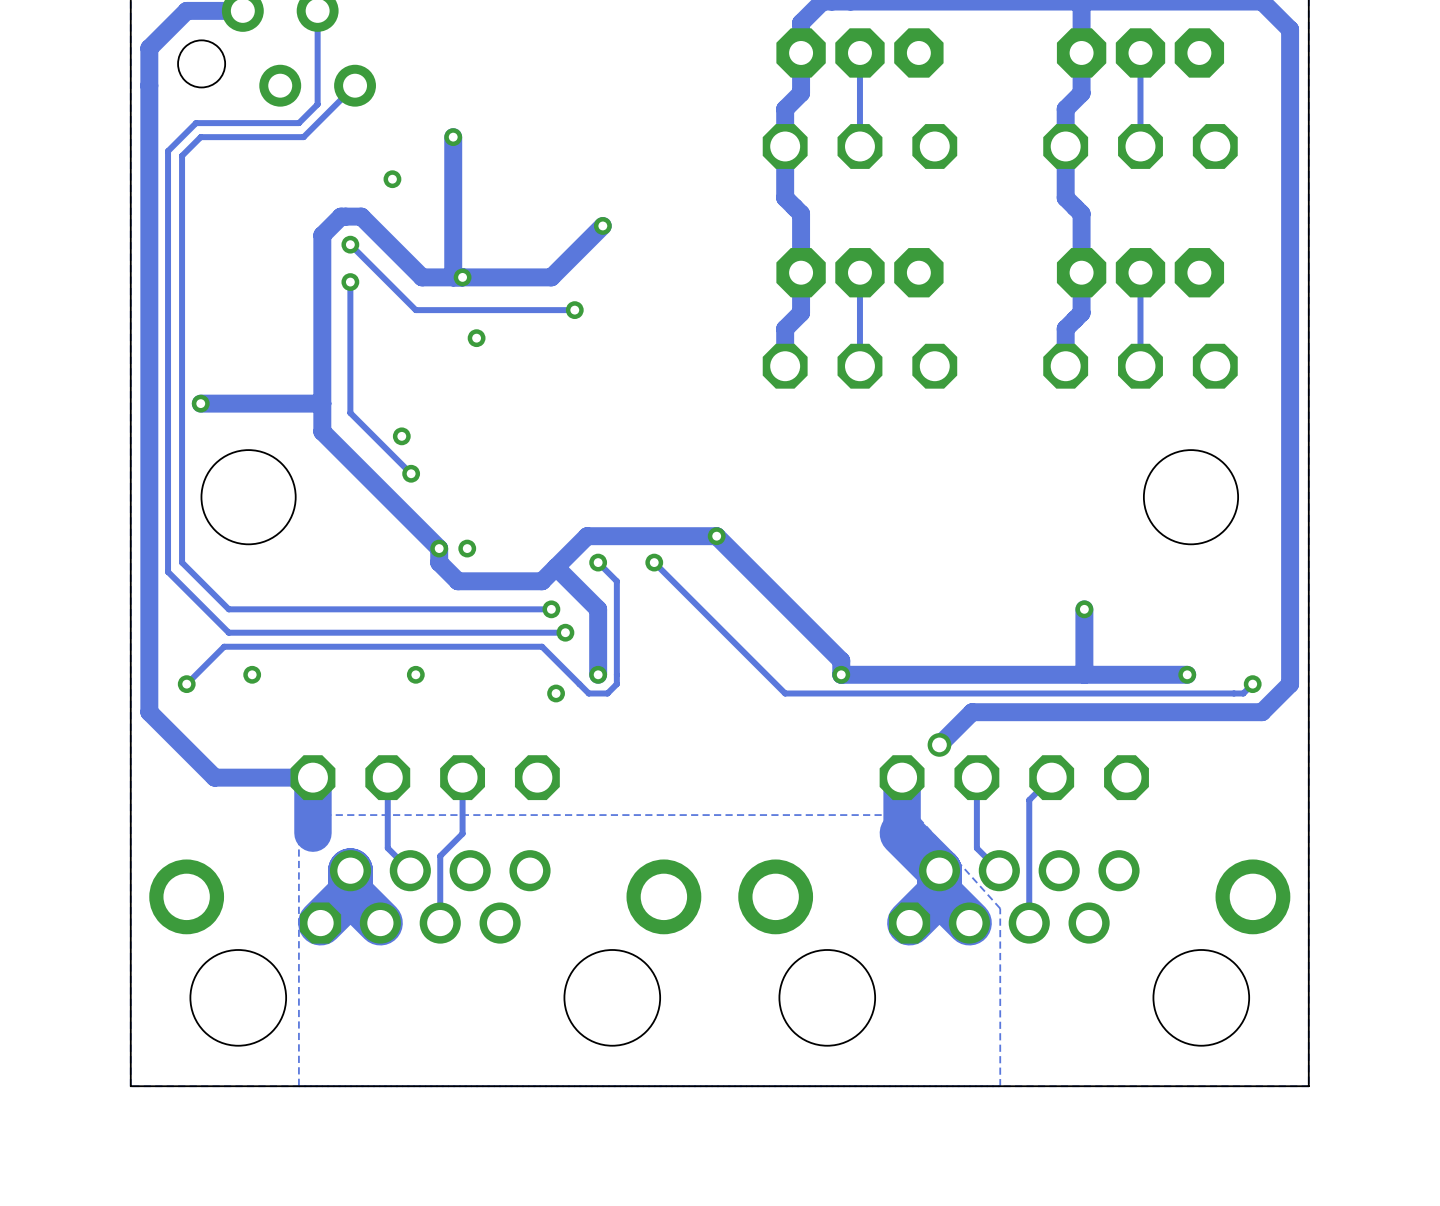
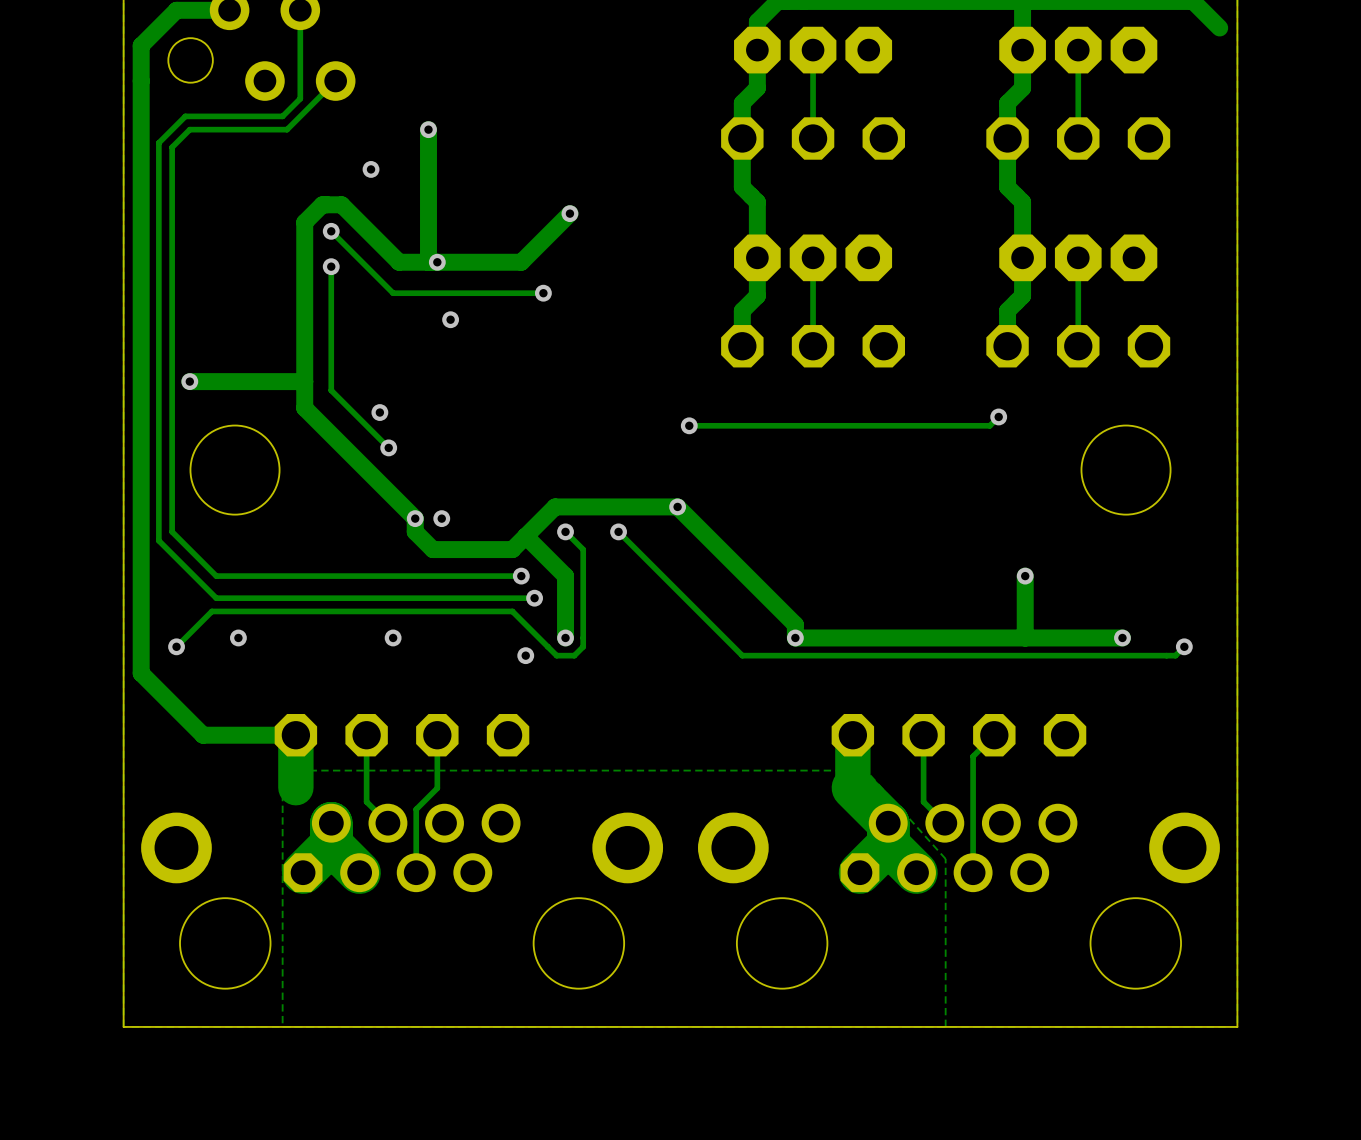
track: (1290, 29) (1290, 684) (1262, 712) (972, 712) (939, 744) -> none
track: none -> (998, 416) (989, 425) (689, 425)
via: none -> (998, 416)
via: none -> (689, 425)
via: (939, 744) -> none

